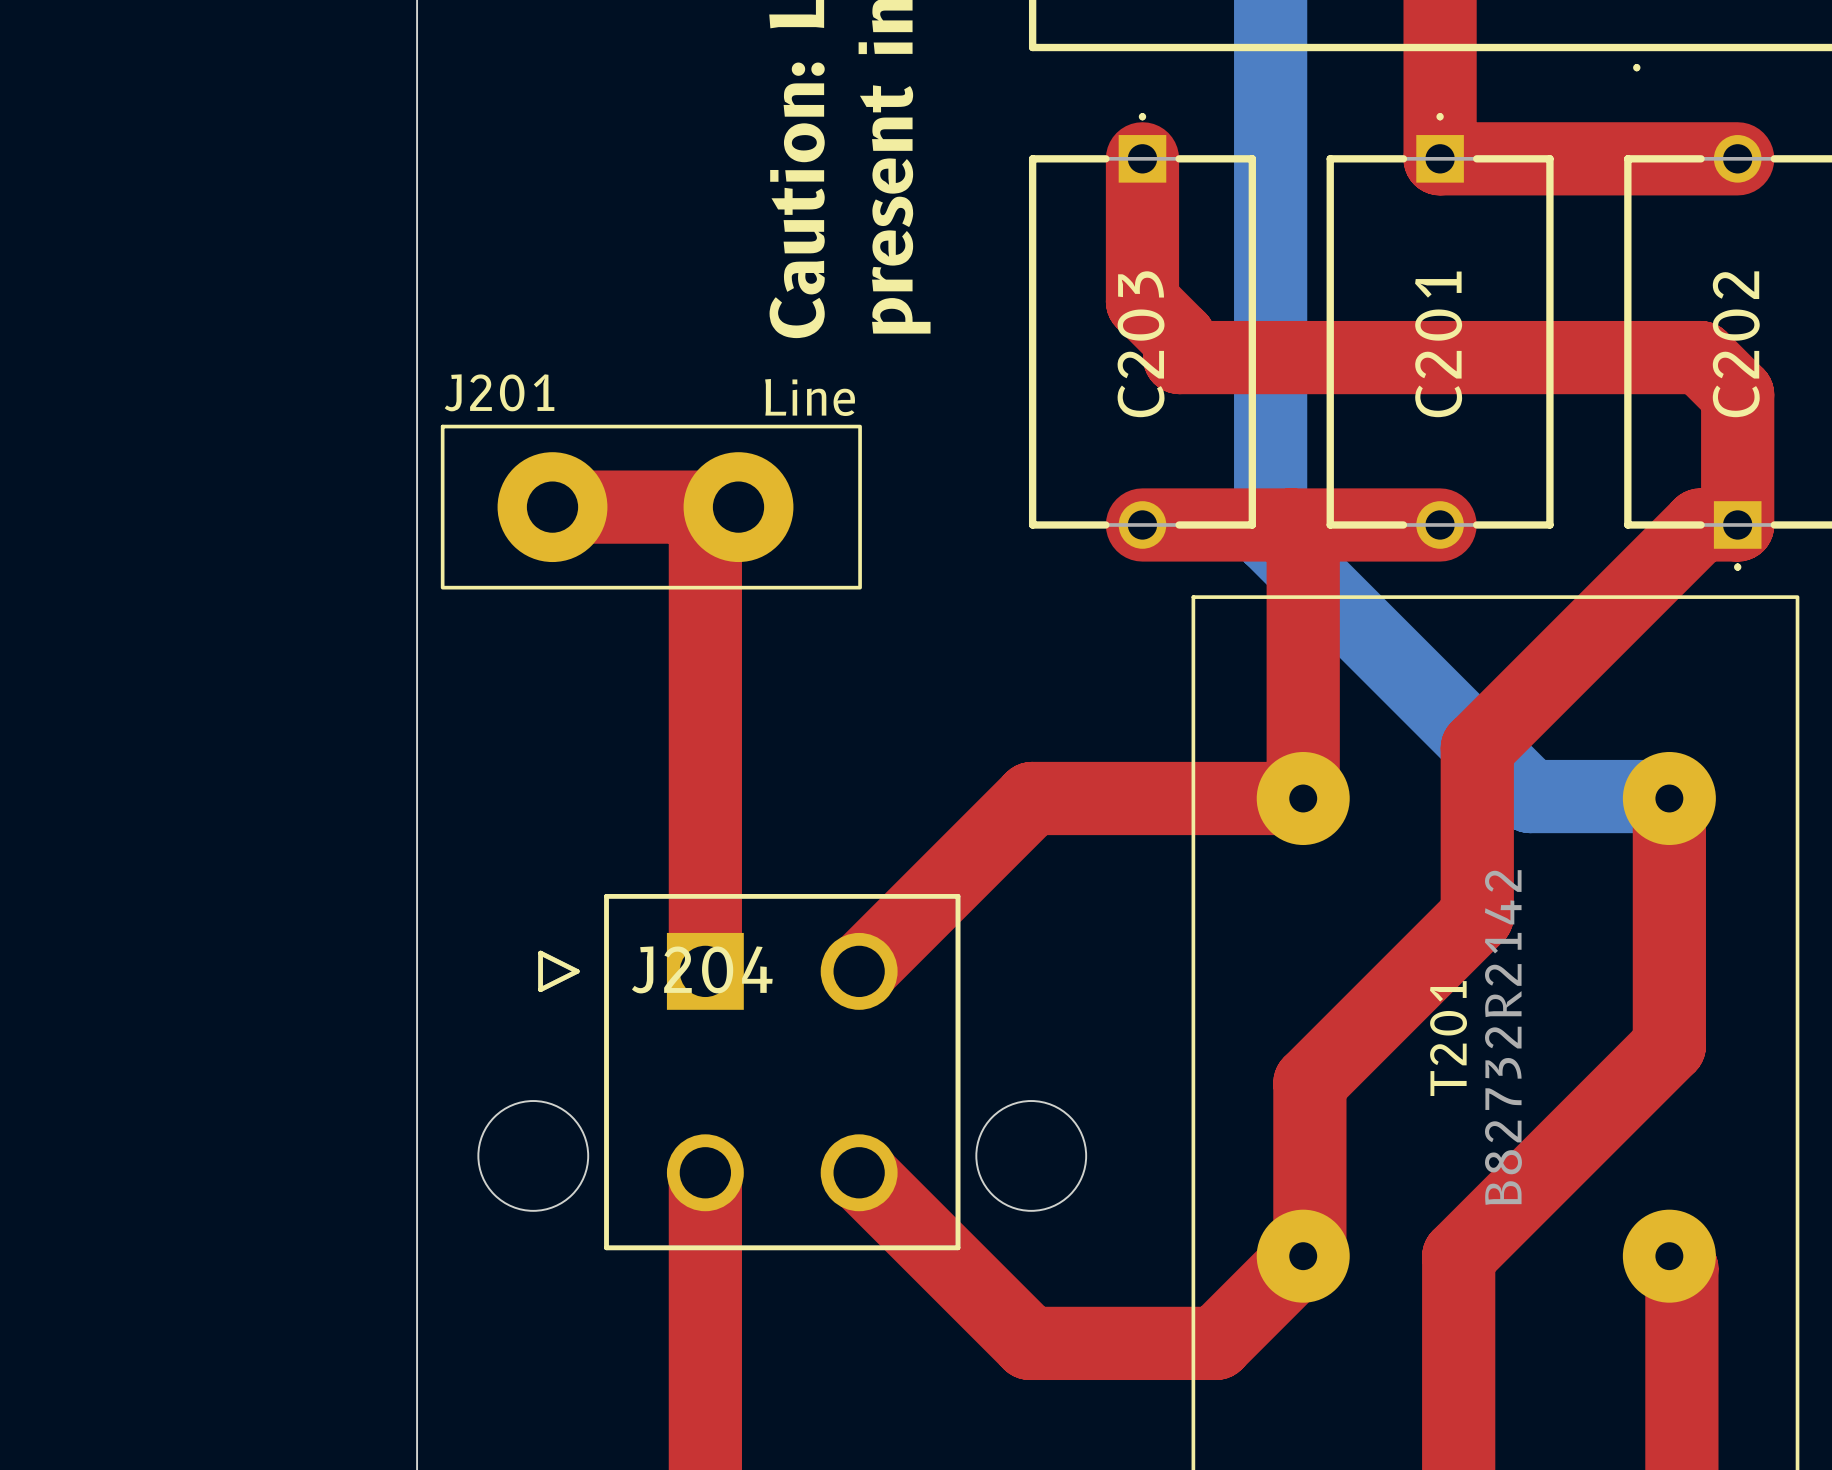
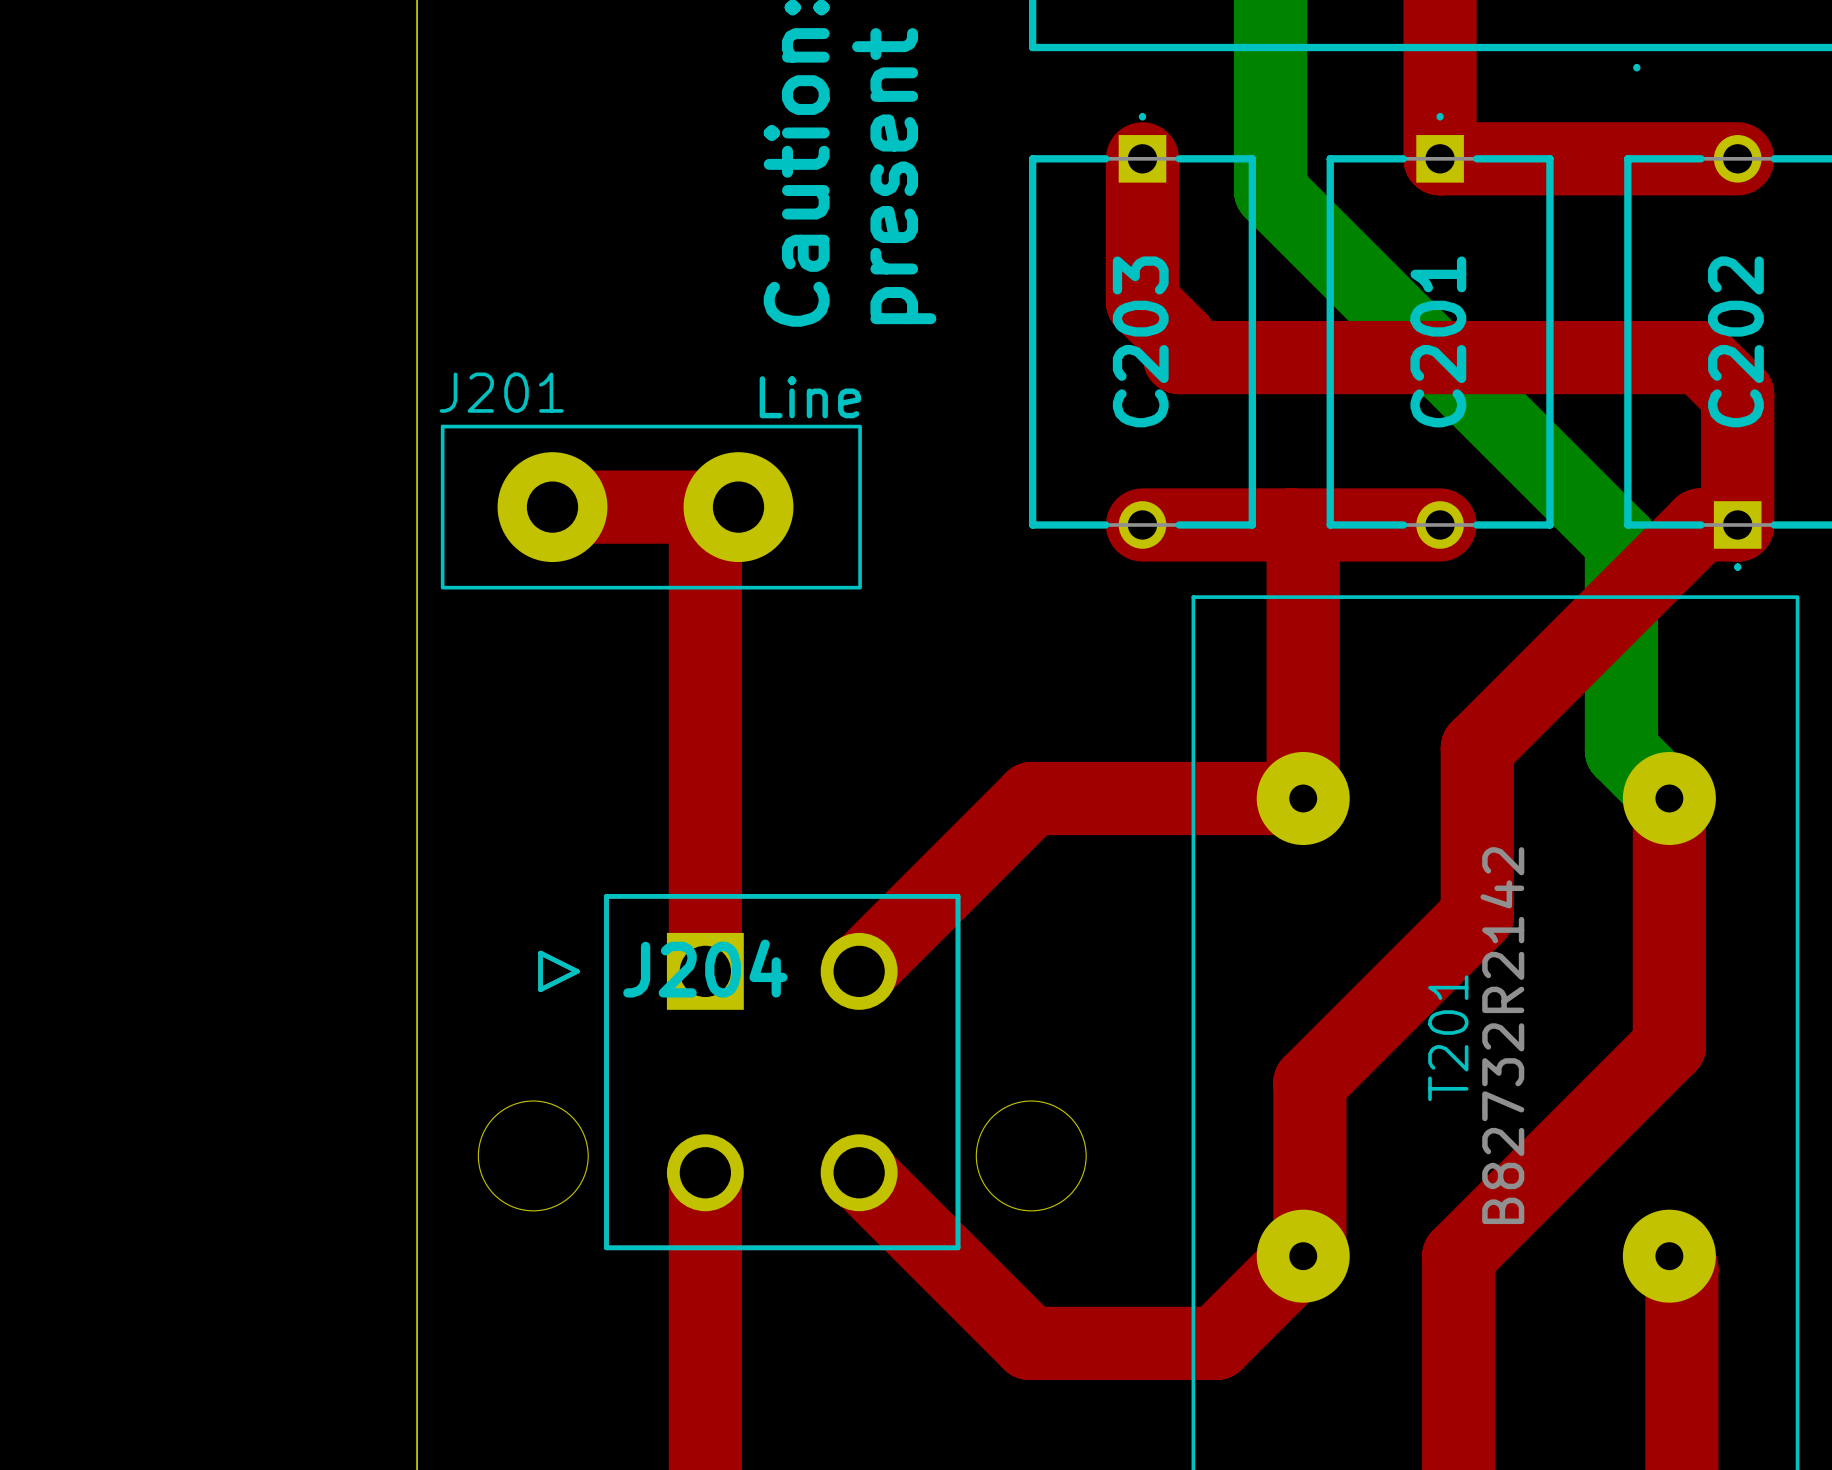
bottom track: (1270, 191) (1270, 536) (1530, 796) (1667, 796) -> (1270, 191) (1621, 541) (1621, 750) (1667, 796)

